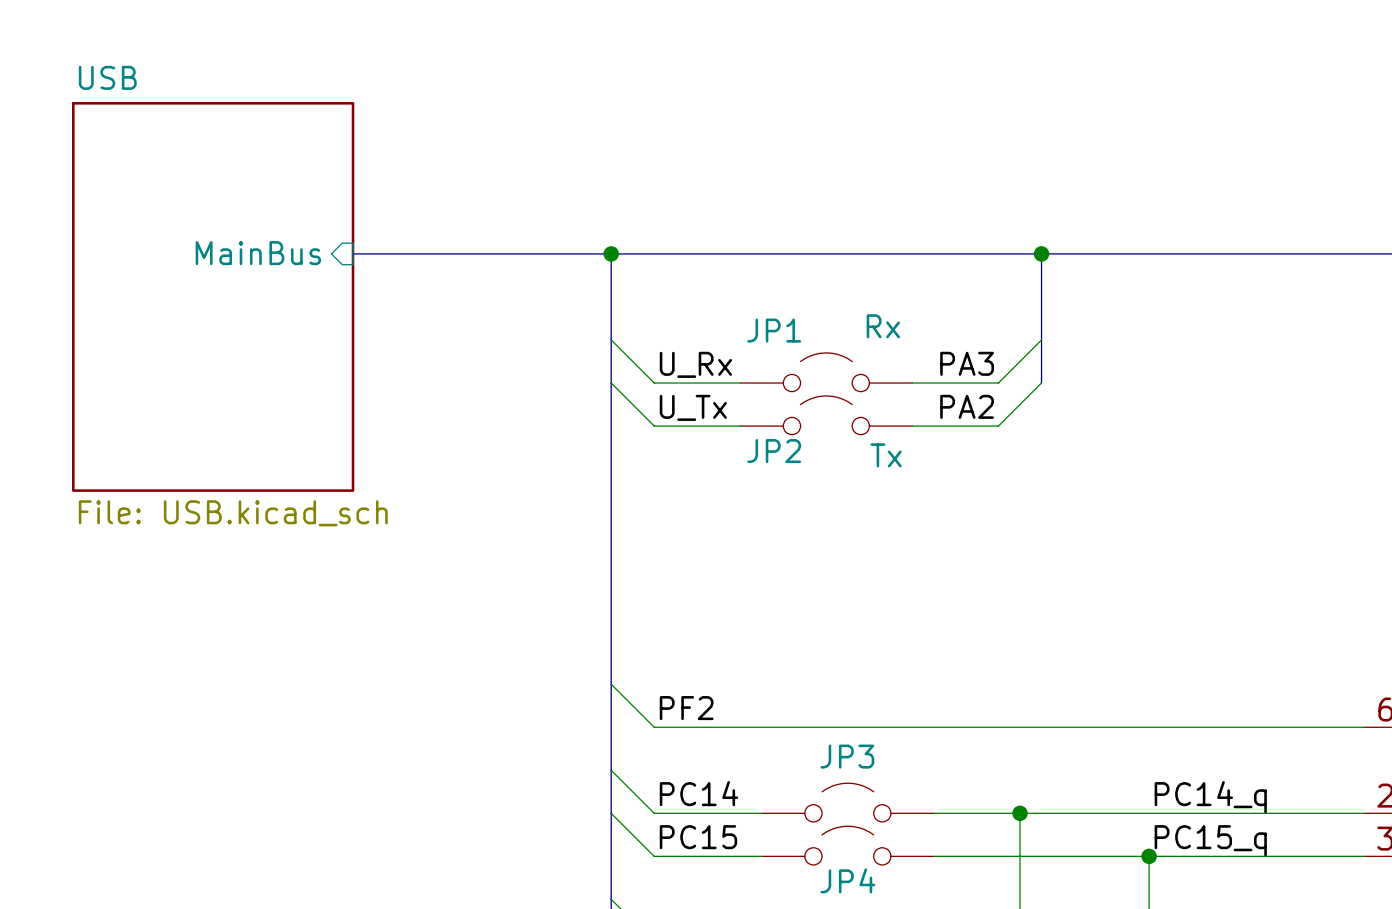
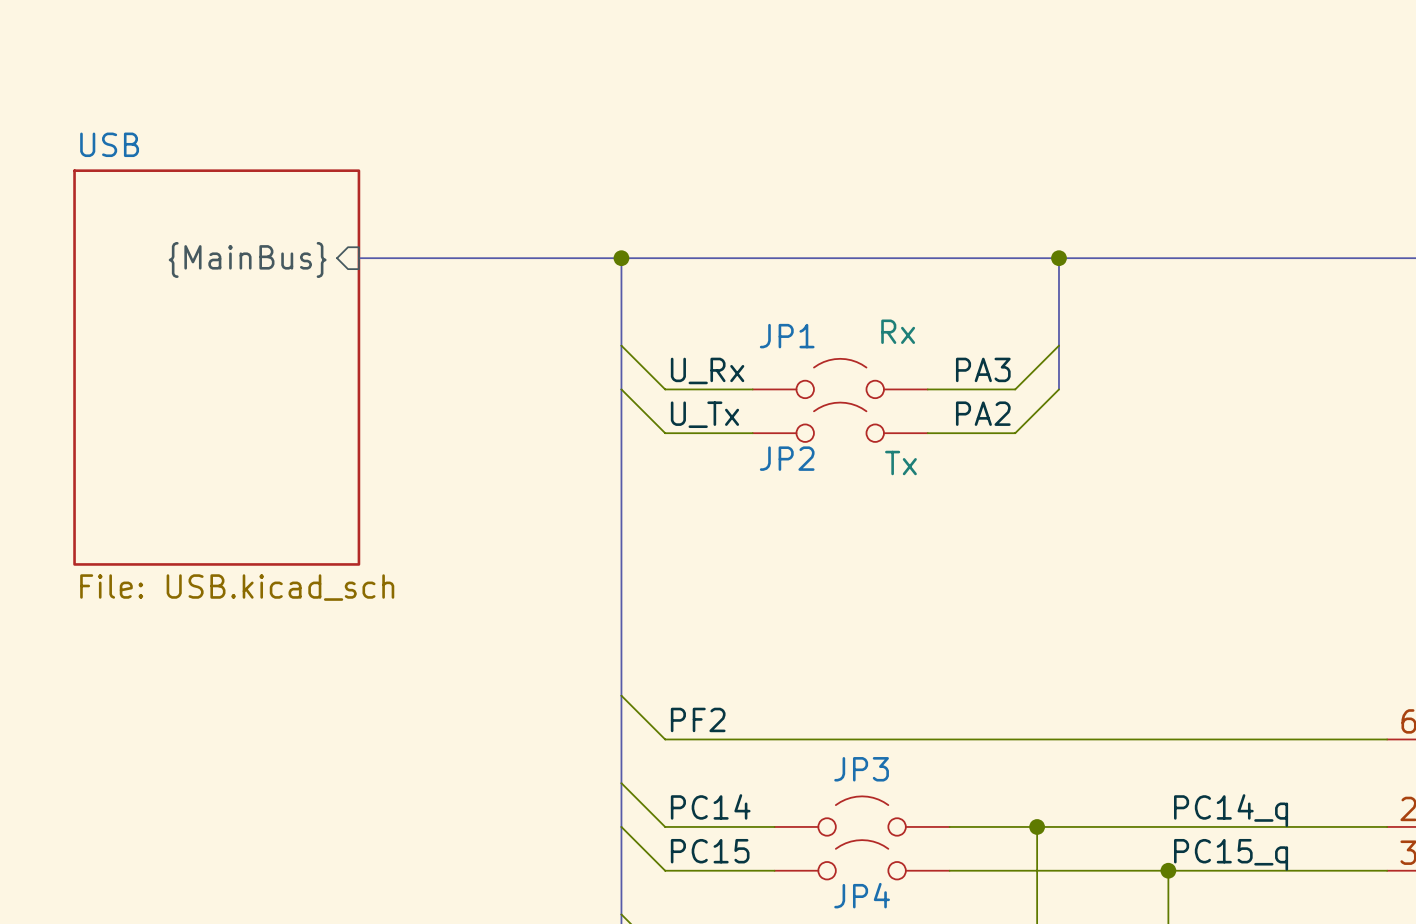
sheet pin: MainBus (258, 253) -> {MainBus} (247, 259)
sheet USB position: (213, 296) -> (216, 367)

